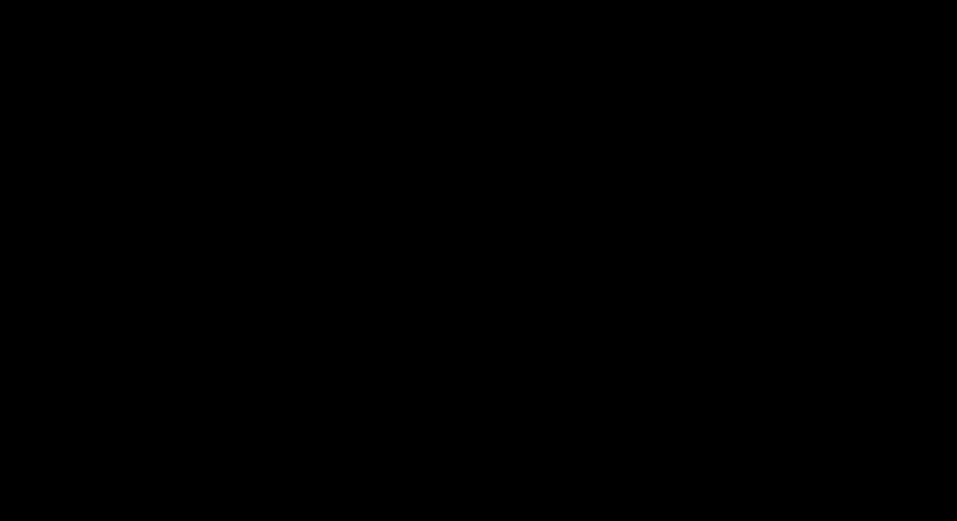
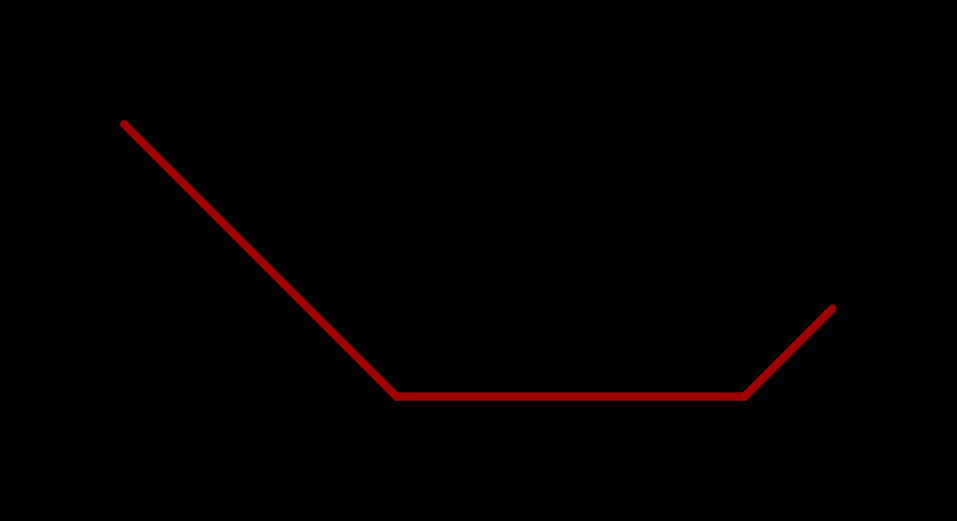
top track: none -> (124, 124) (396, 396) (744, 396) (832, 308)

